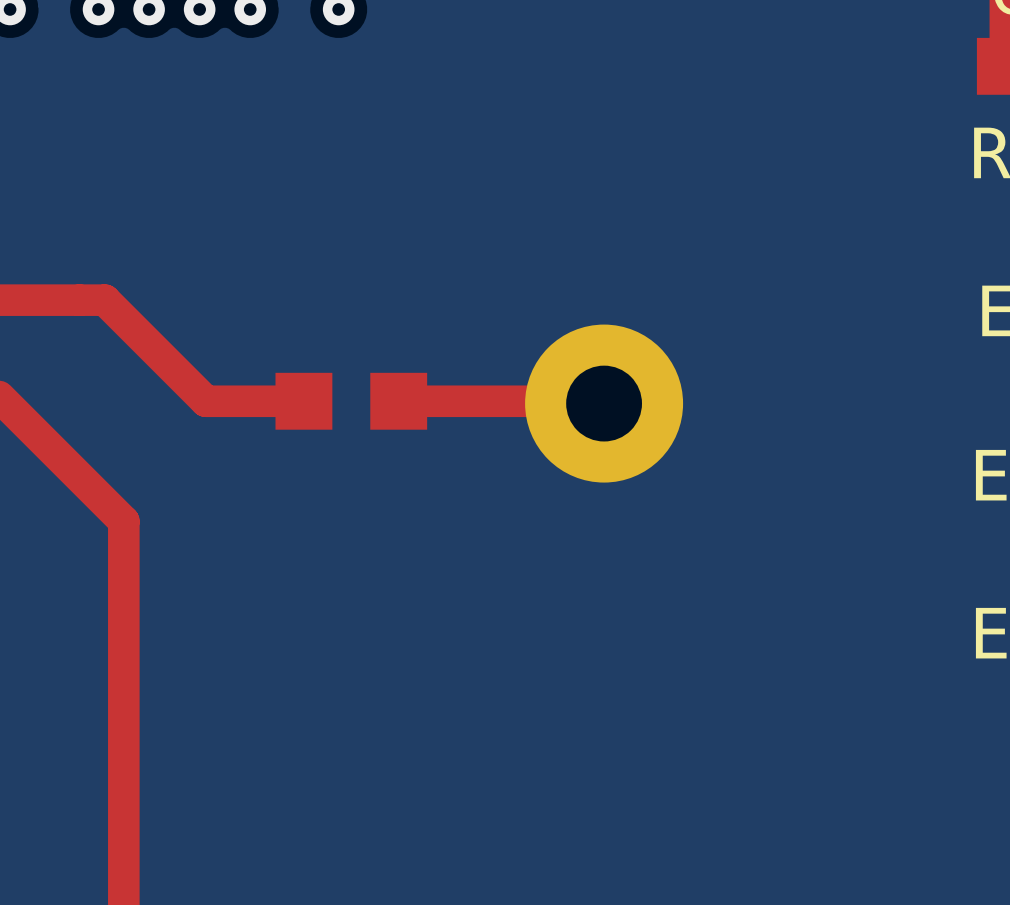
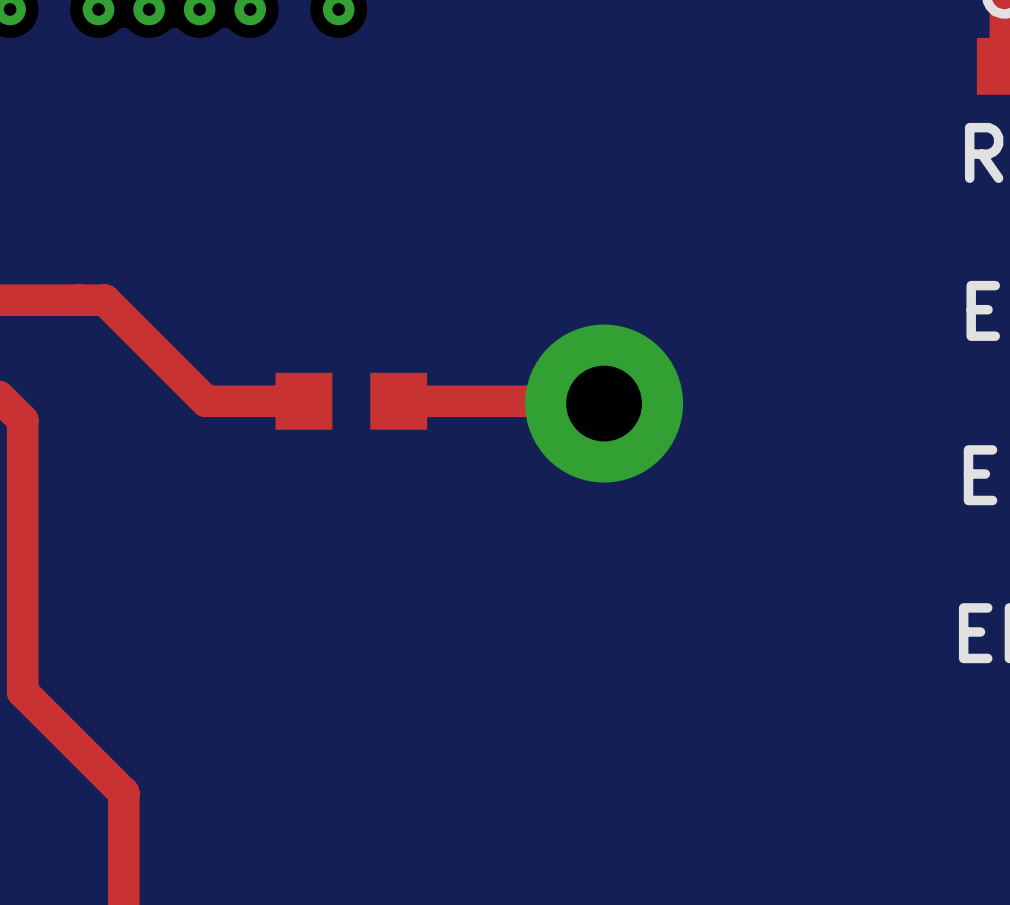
top track: (22, 420) (123, 521) (123, 793) -> (22, 420) (22, 691) (123, 793)

